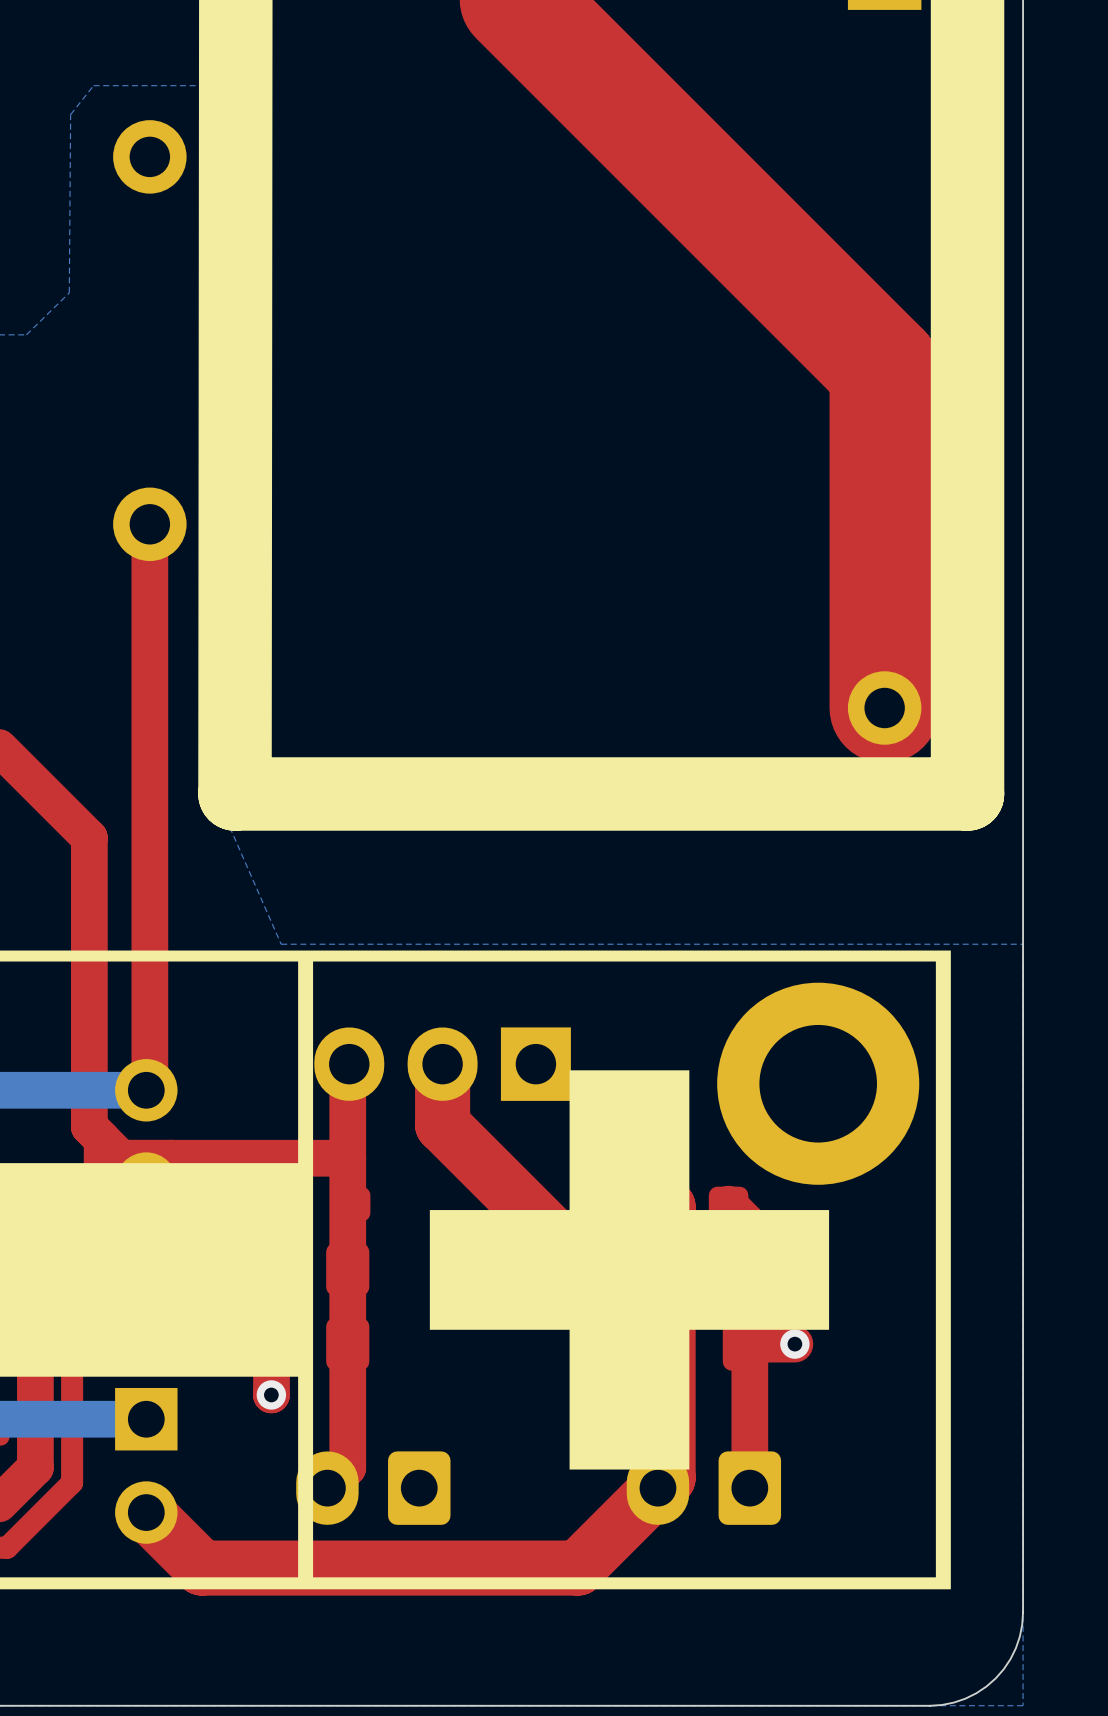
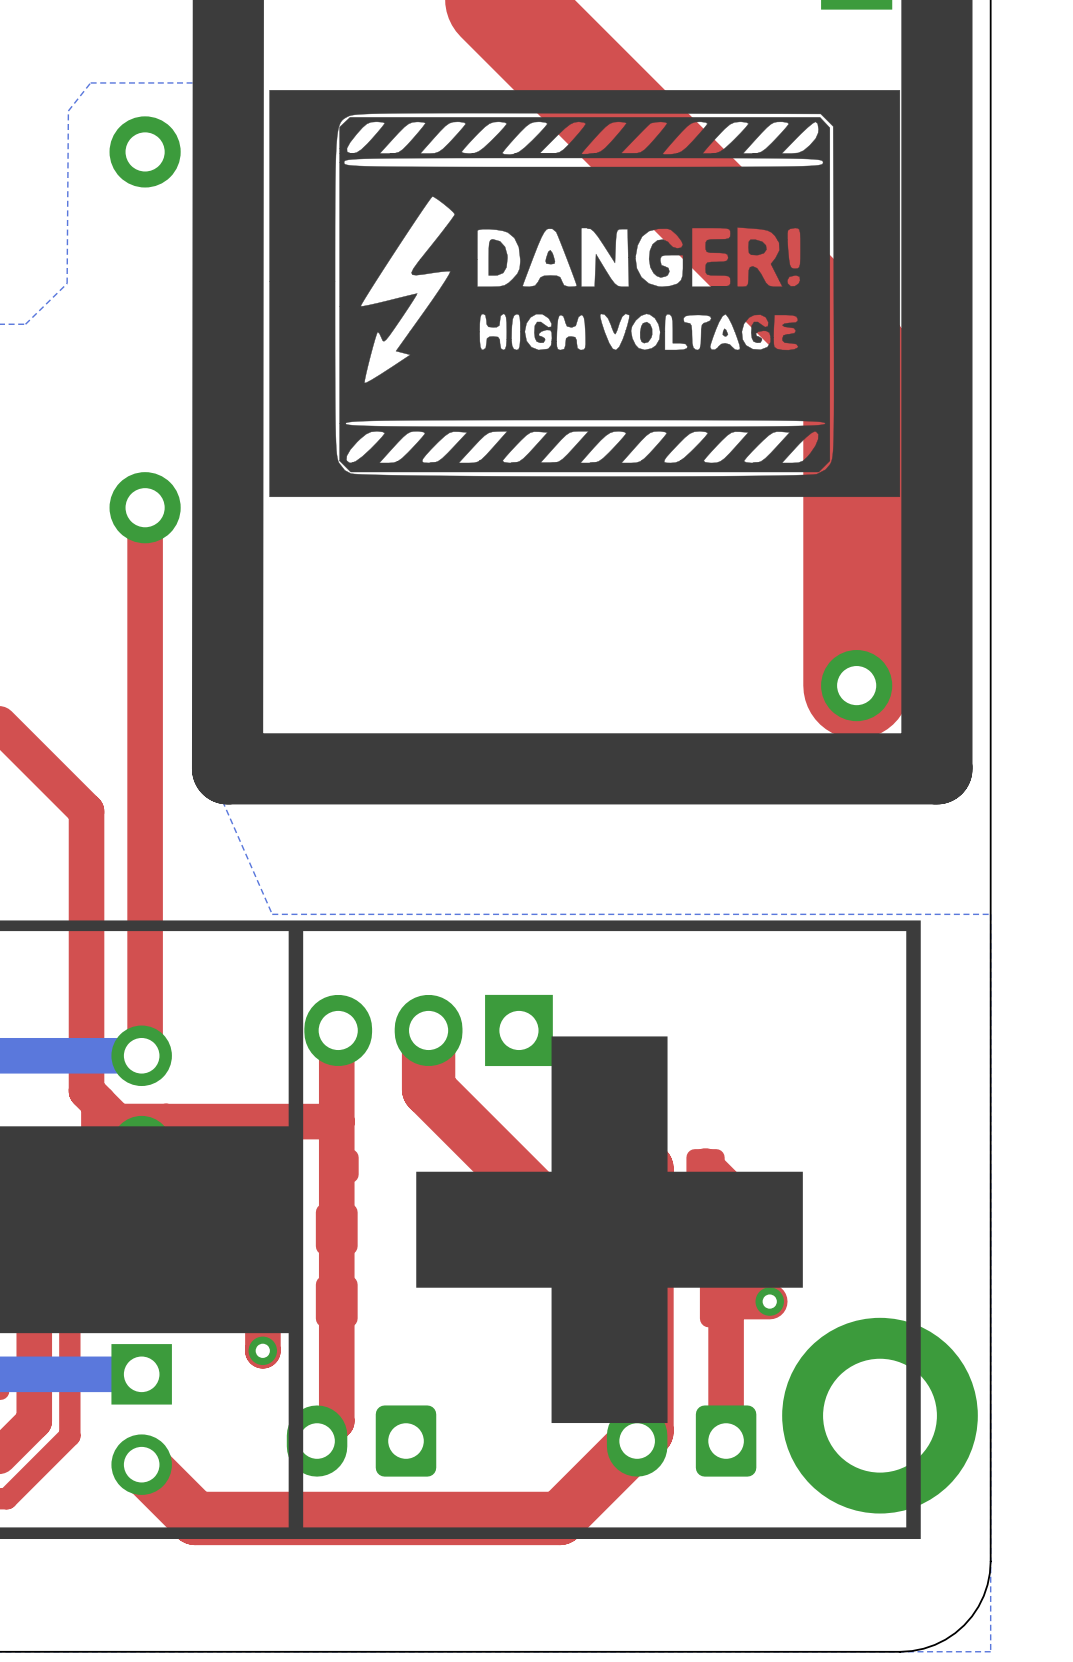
drawing: none -> [269, 90, 901, 498]
part position: (818, 1083) -> (879, 1415)

